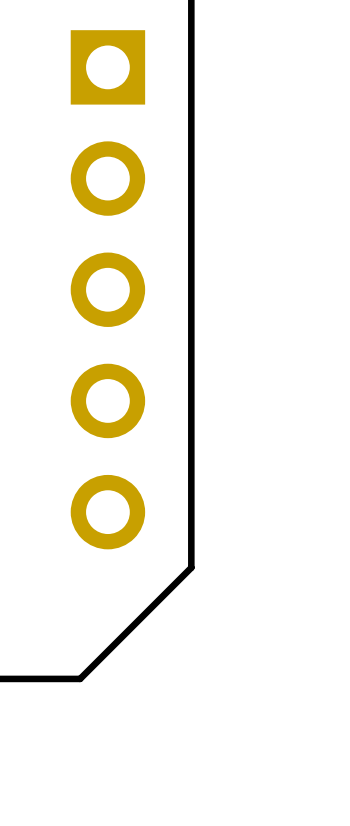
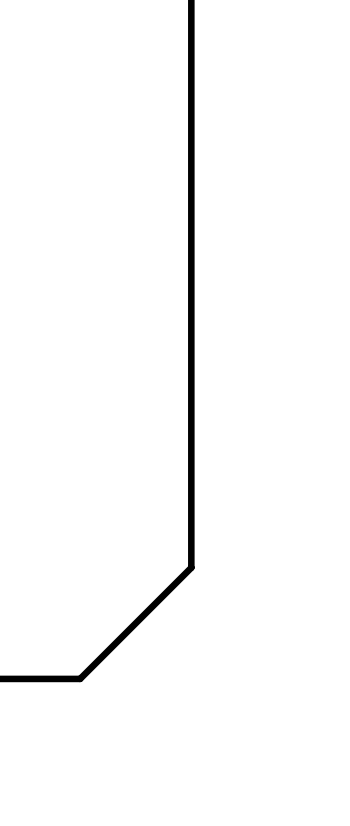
part: (107, 289) -> none

